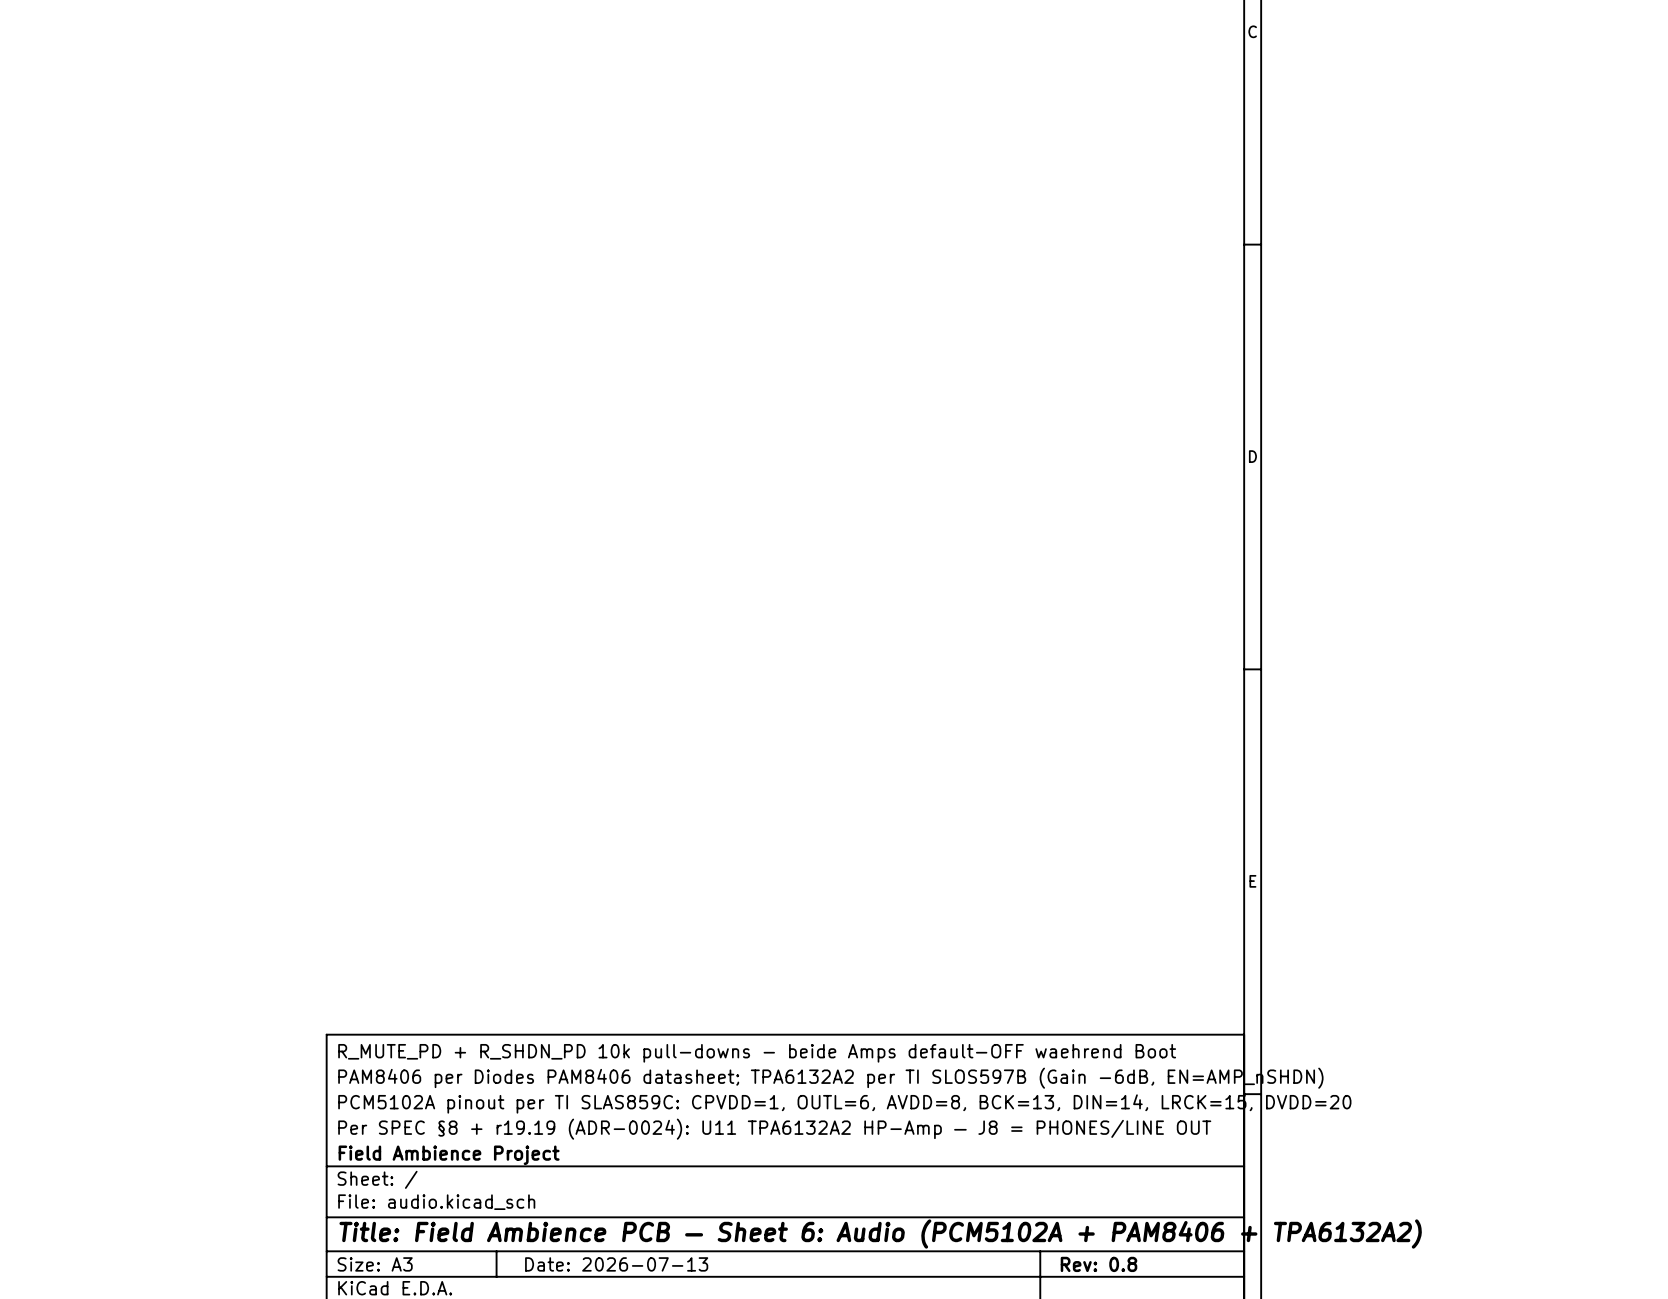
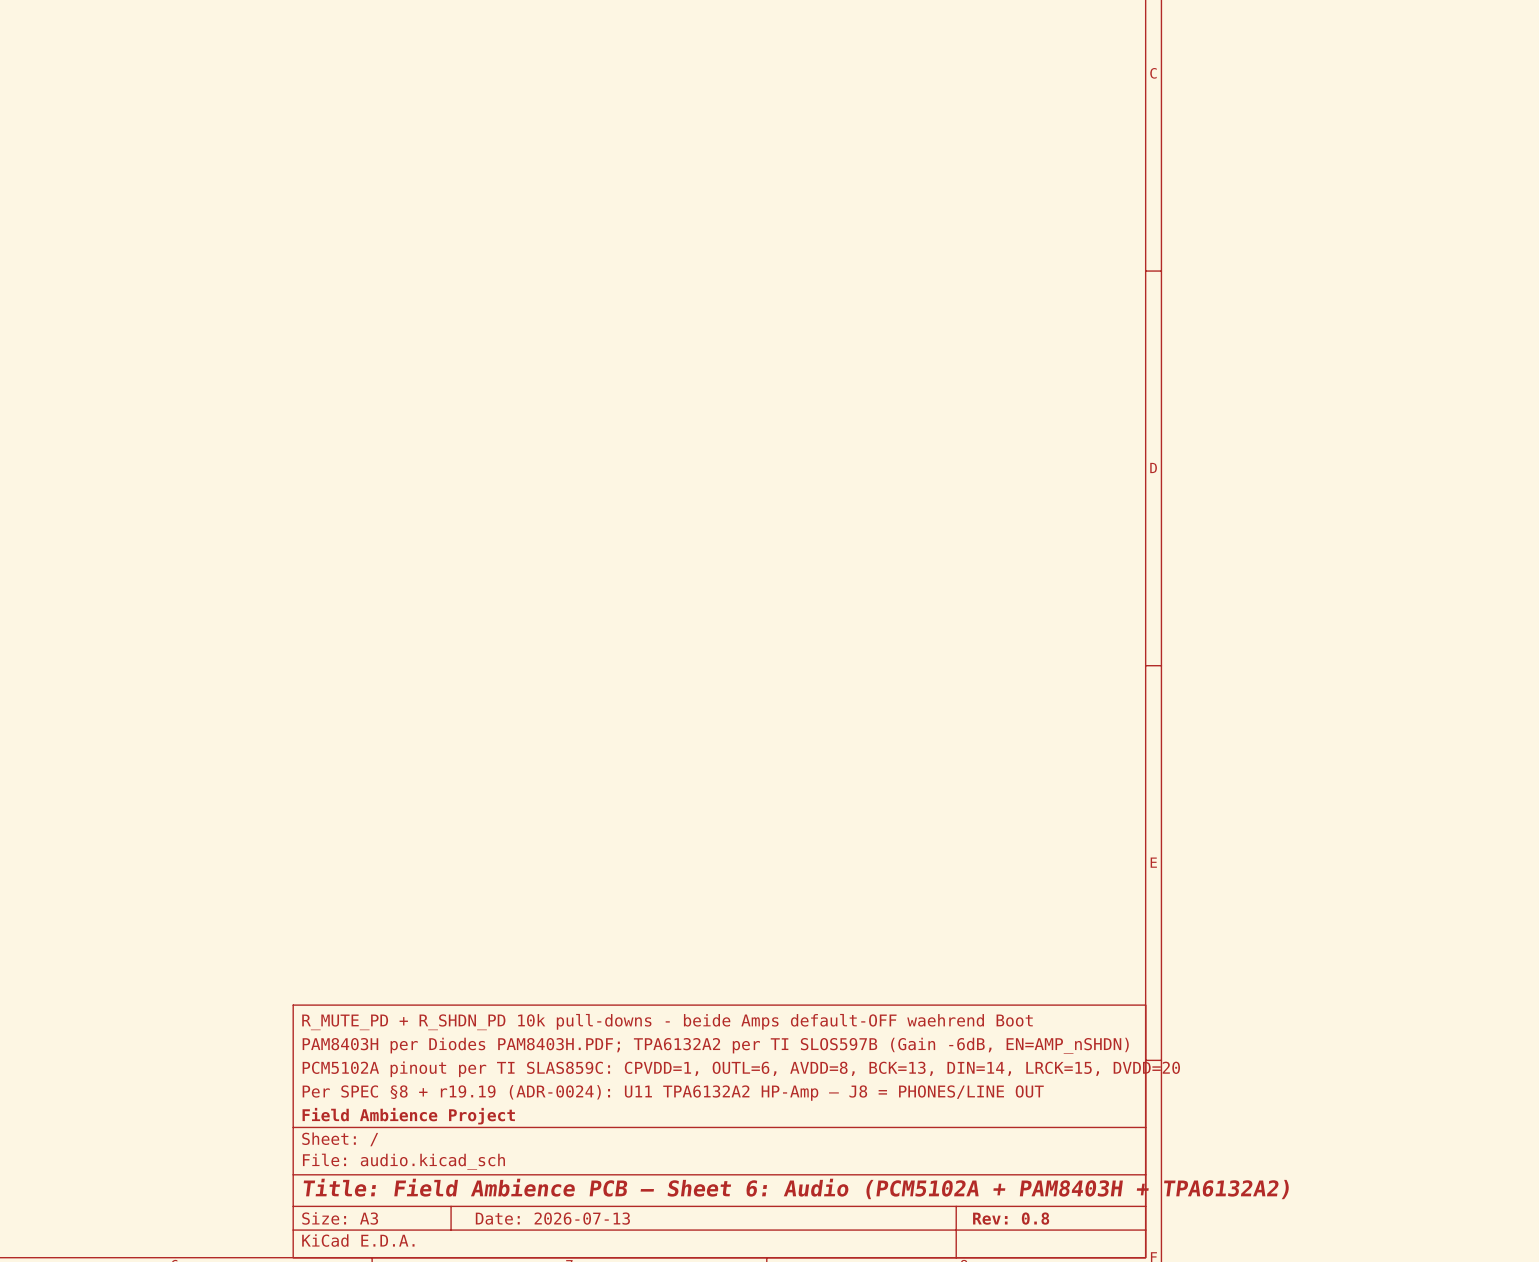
title block: PAM8406 per Diodes PAM8406 datasheet; TPA6132A2 per TI SLOS597B (Gain -6dB, EN=AMP_nSHDN) (830, 1078) -> PAM8403H per Diodes PAM8403H.PDF; TPA6132A2 per TI SLOS597B (Gain -6dB, EN=AMP_nSHDN) (715, 1045)
title block: Title: Field Ambience PCB — Sheet 6: Audio (PCM5102A + PAM8406 + TPA6132A2) (880, 1234) -> Title: Field Ambience PCB — Sheet 6: Audio (PCM5102A + PAM8403H + TPA6132A2) (796, 1188)

